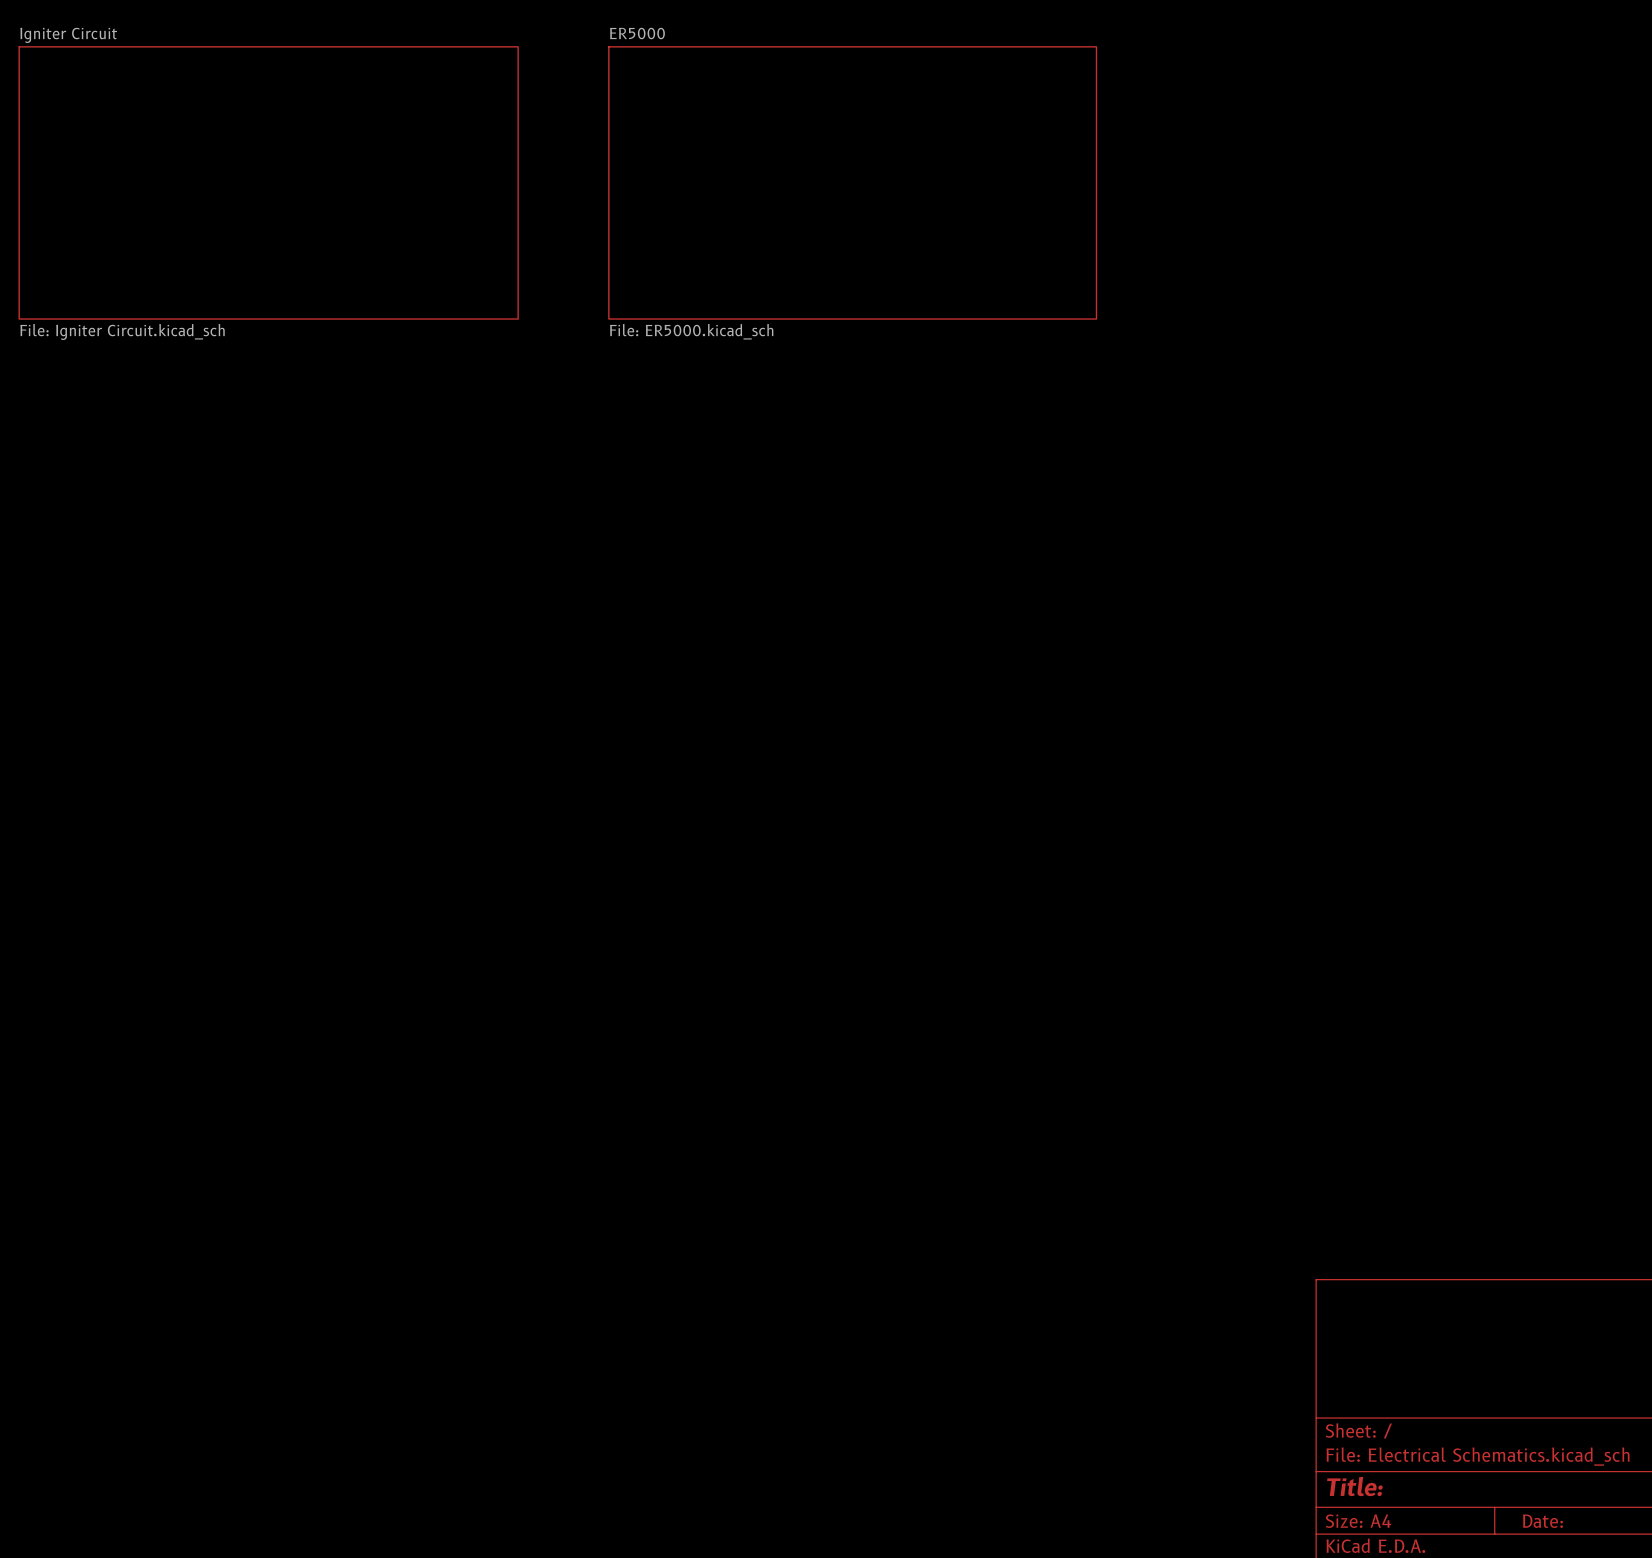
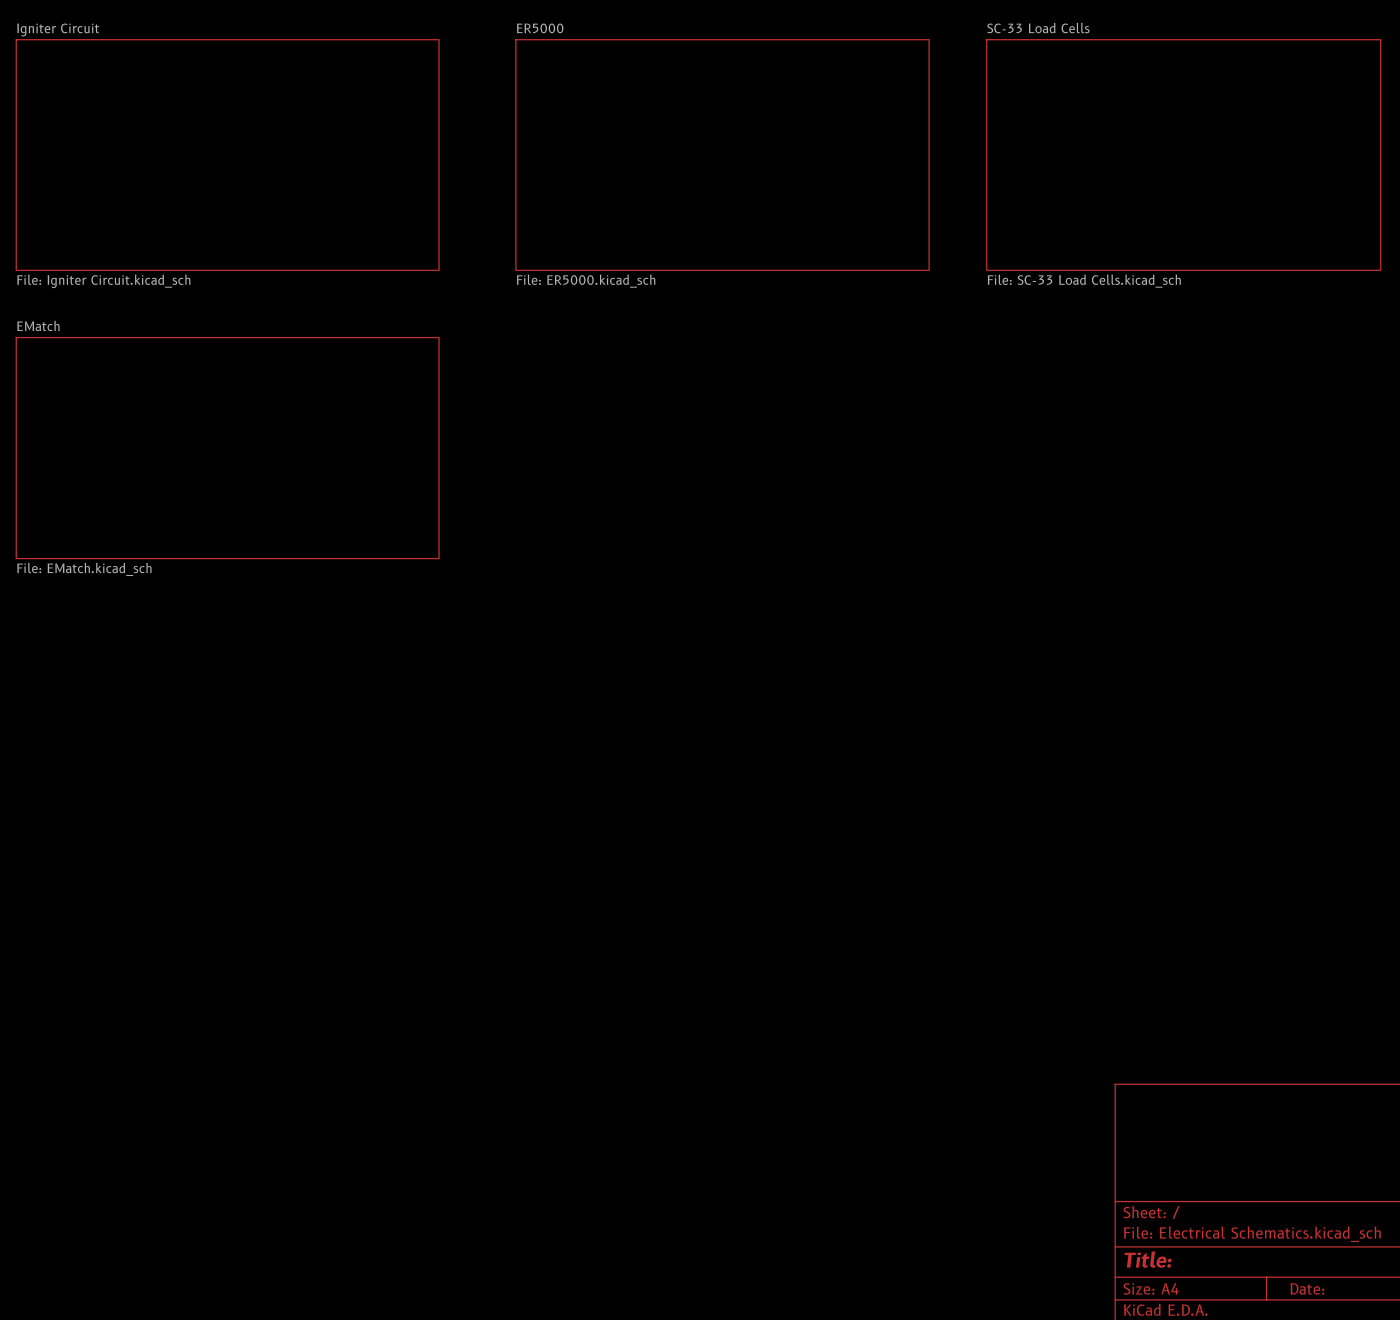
sheet SC-33 Load Cells: none -> File: SC-33 Load Cells.kicad_sch (1183, 155)
sheet EMatch: none -> File: EMatch.kicad_sch (227, 448)

